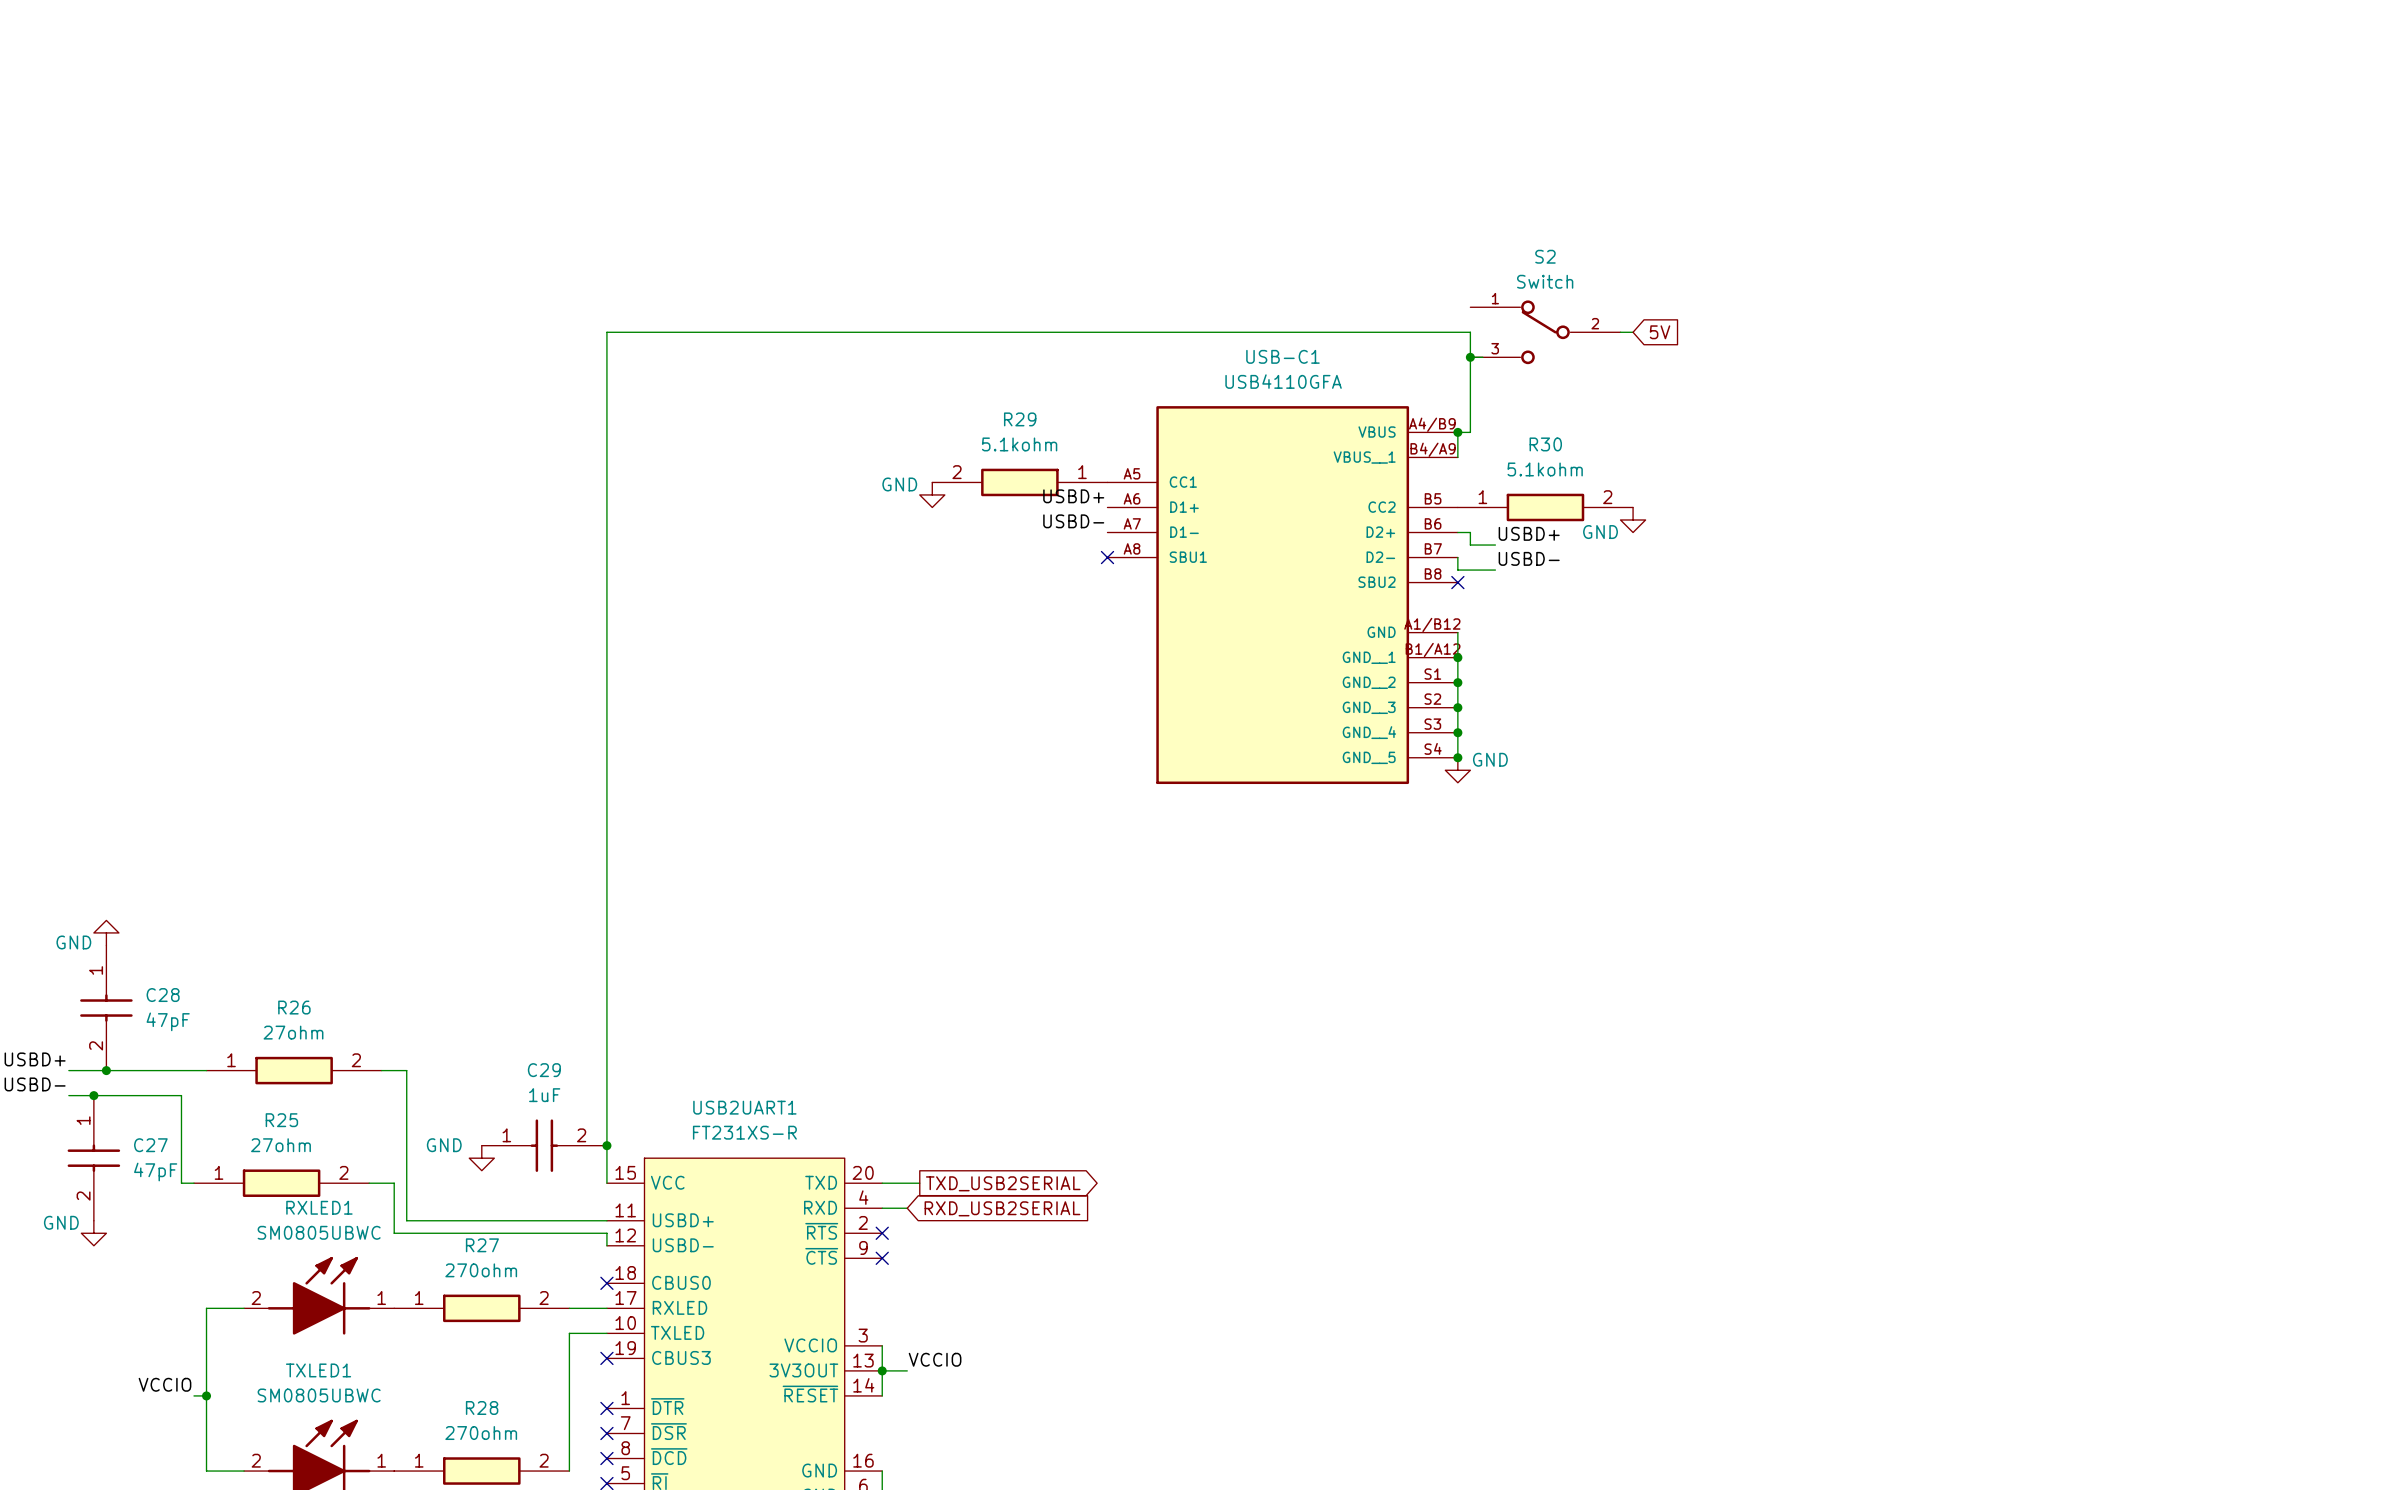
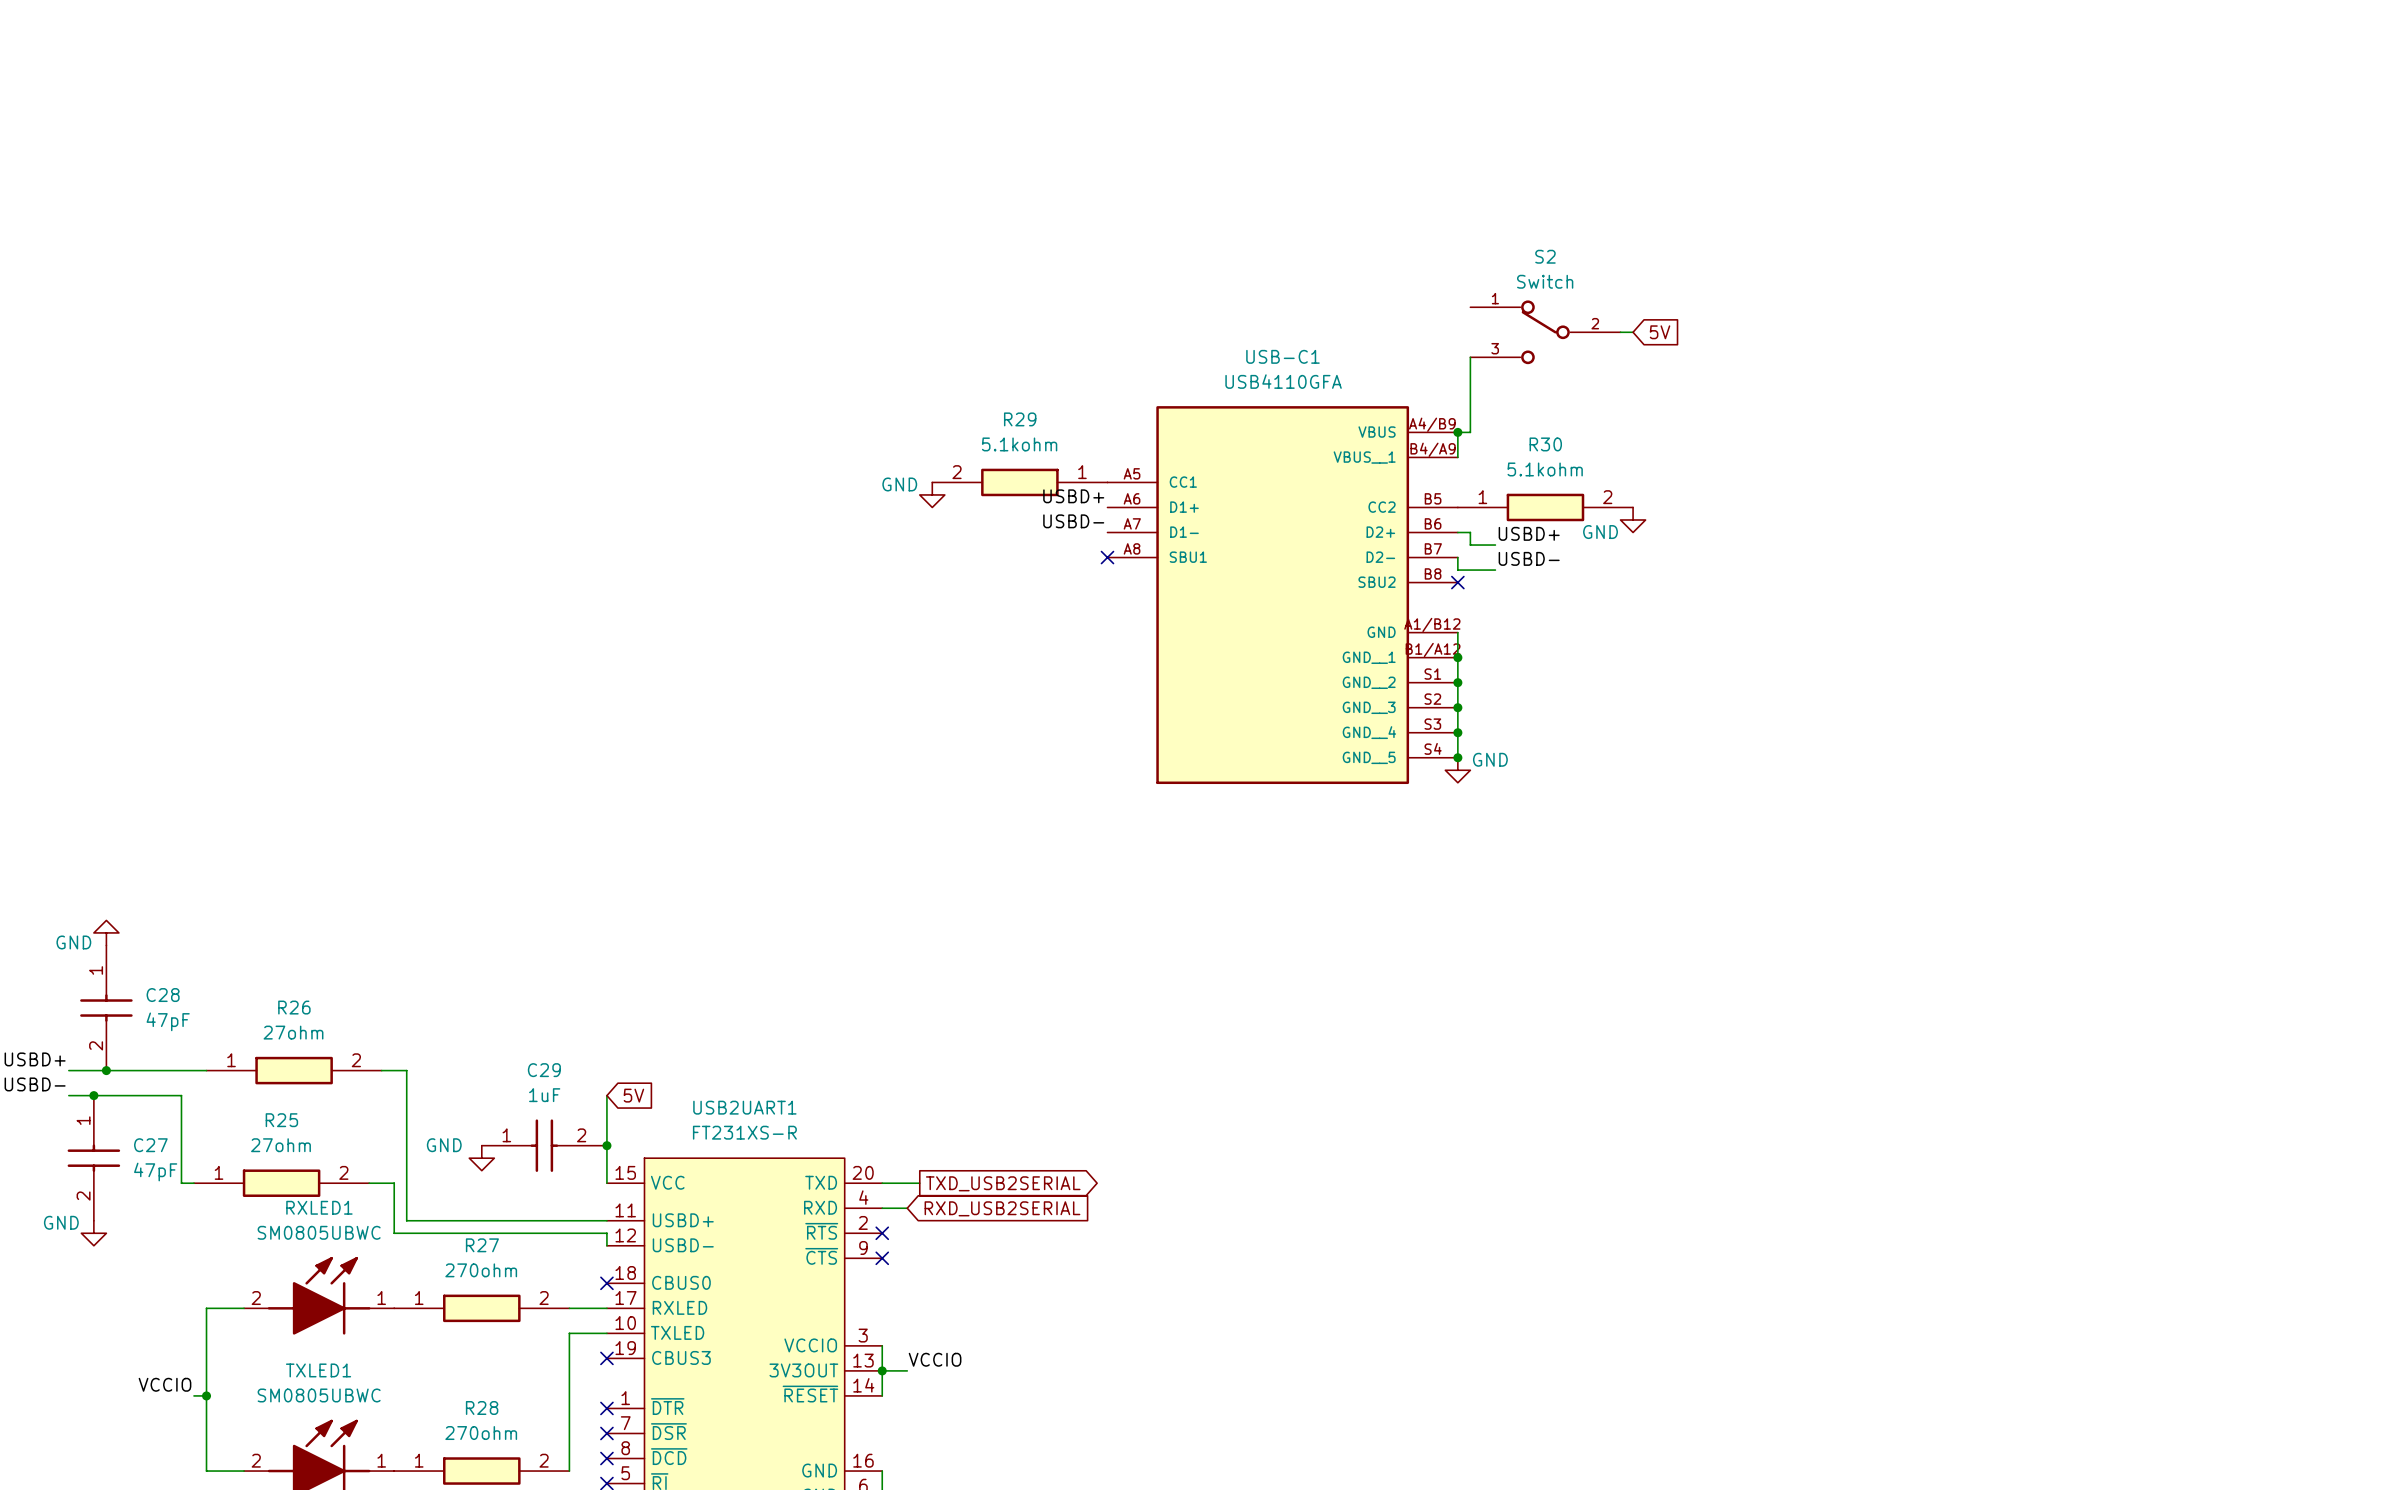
junction: (1470, 357) -> none
wire: (1482, 357) (1470, 357) (1470, 332) (606, 332) (606, 1095) -> none
global label: none -> 5V (633, 1095)

